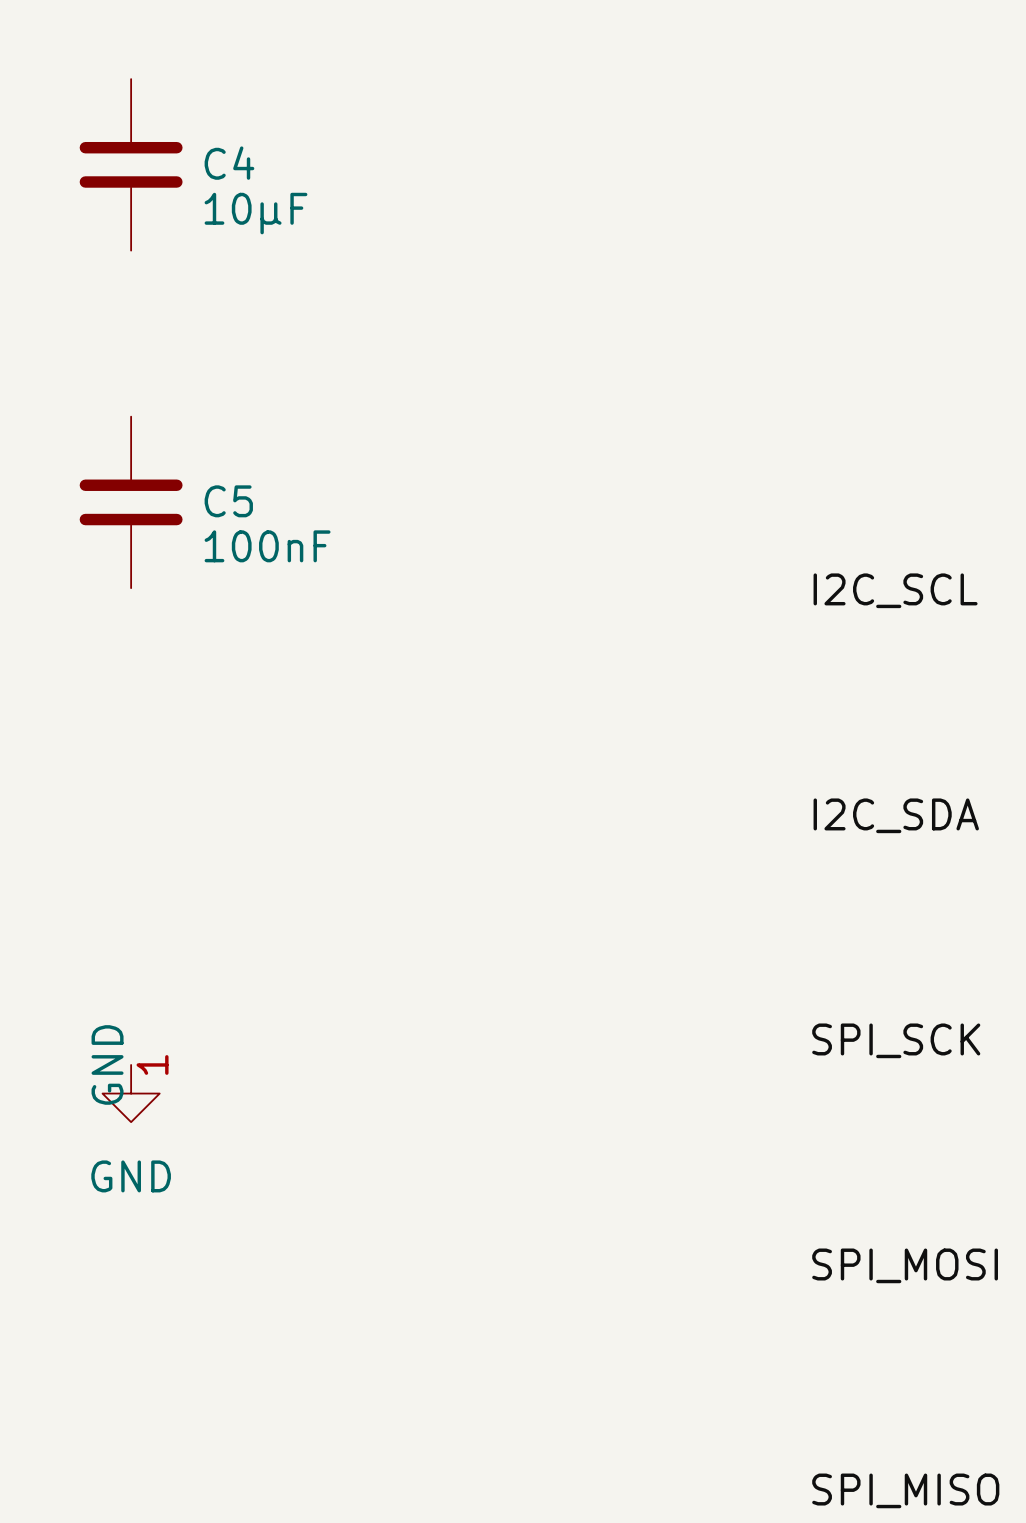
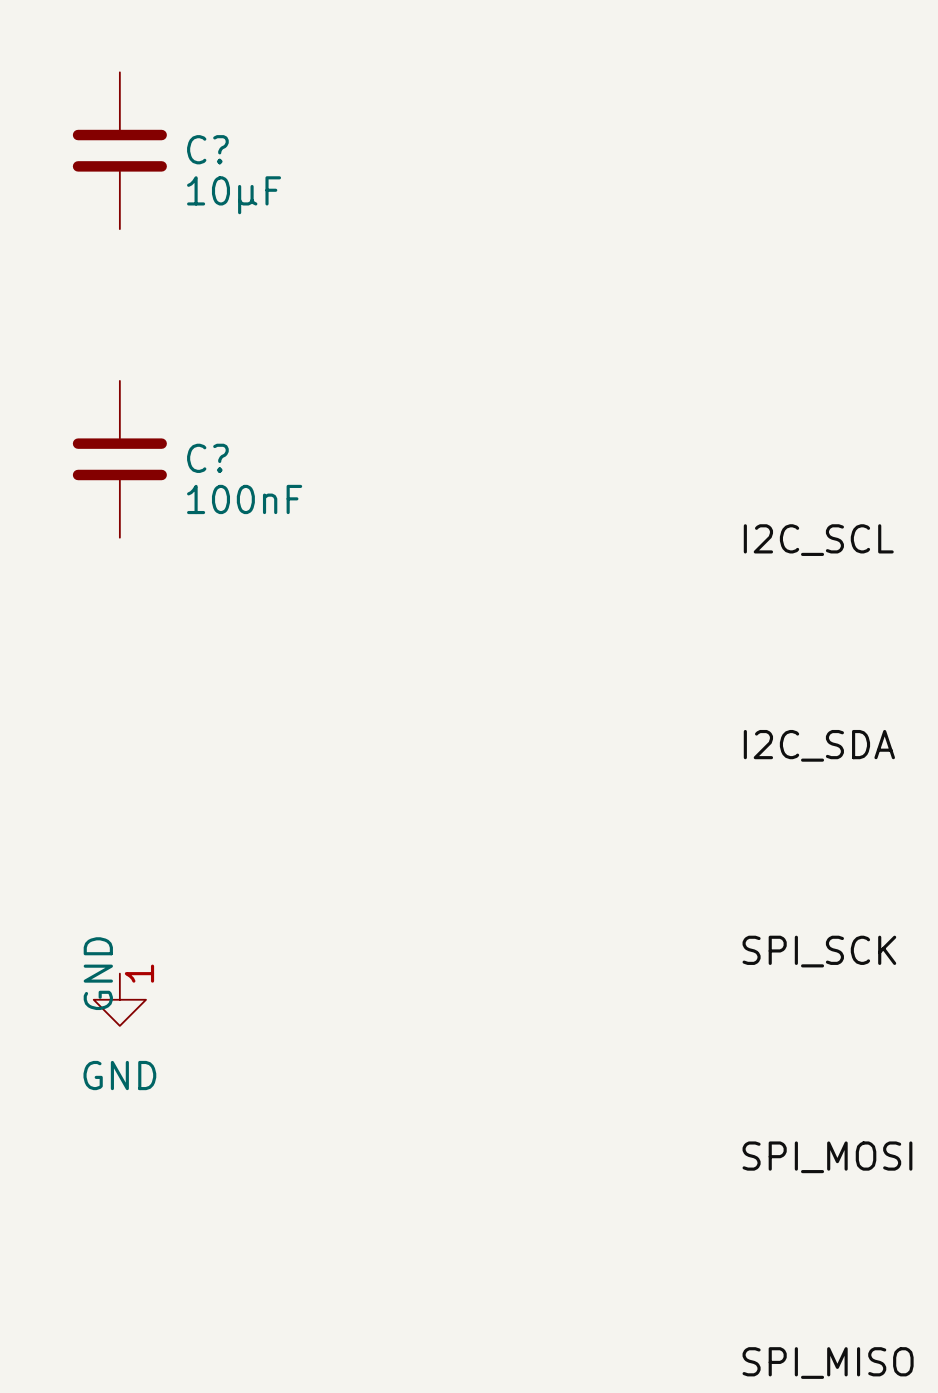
C4 name: C4 (229, 163) -> C? (207, 149)
C5 name: C5 (228, 501) -> C? (207, 458)

